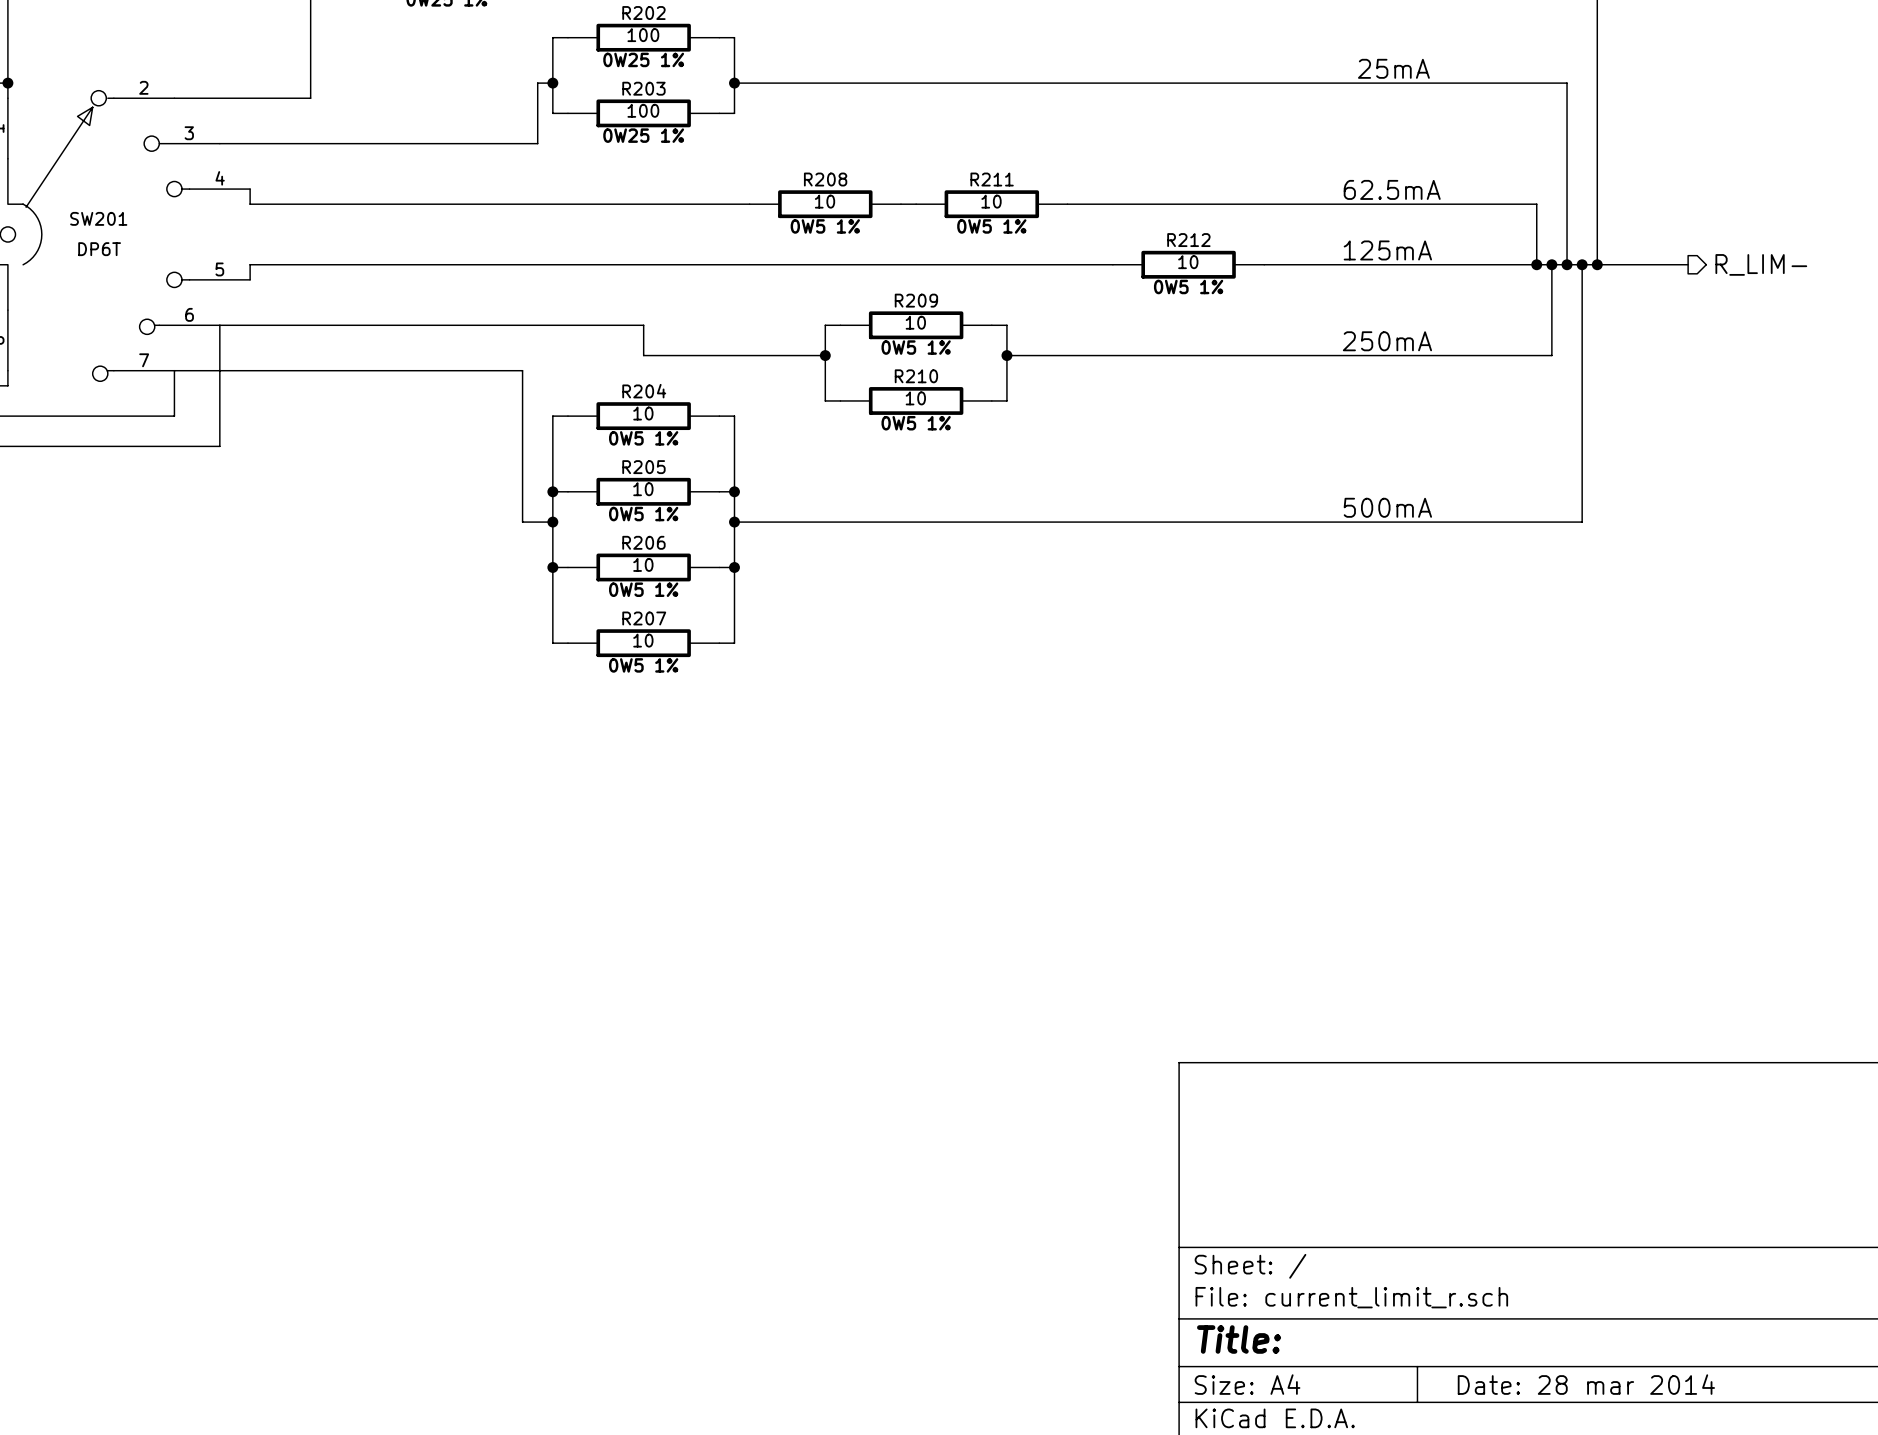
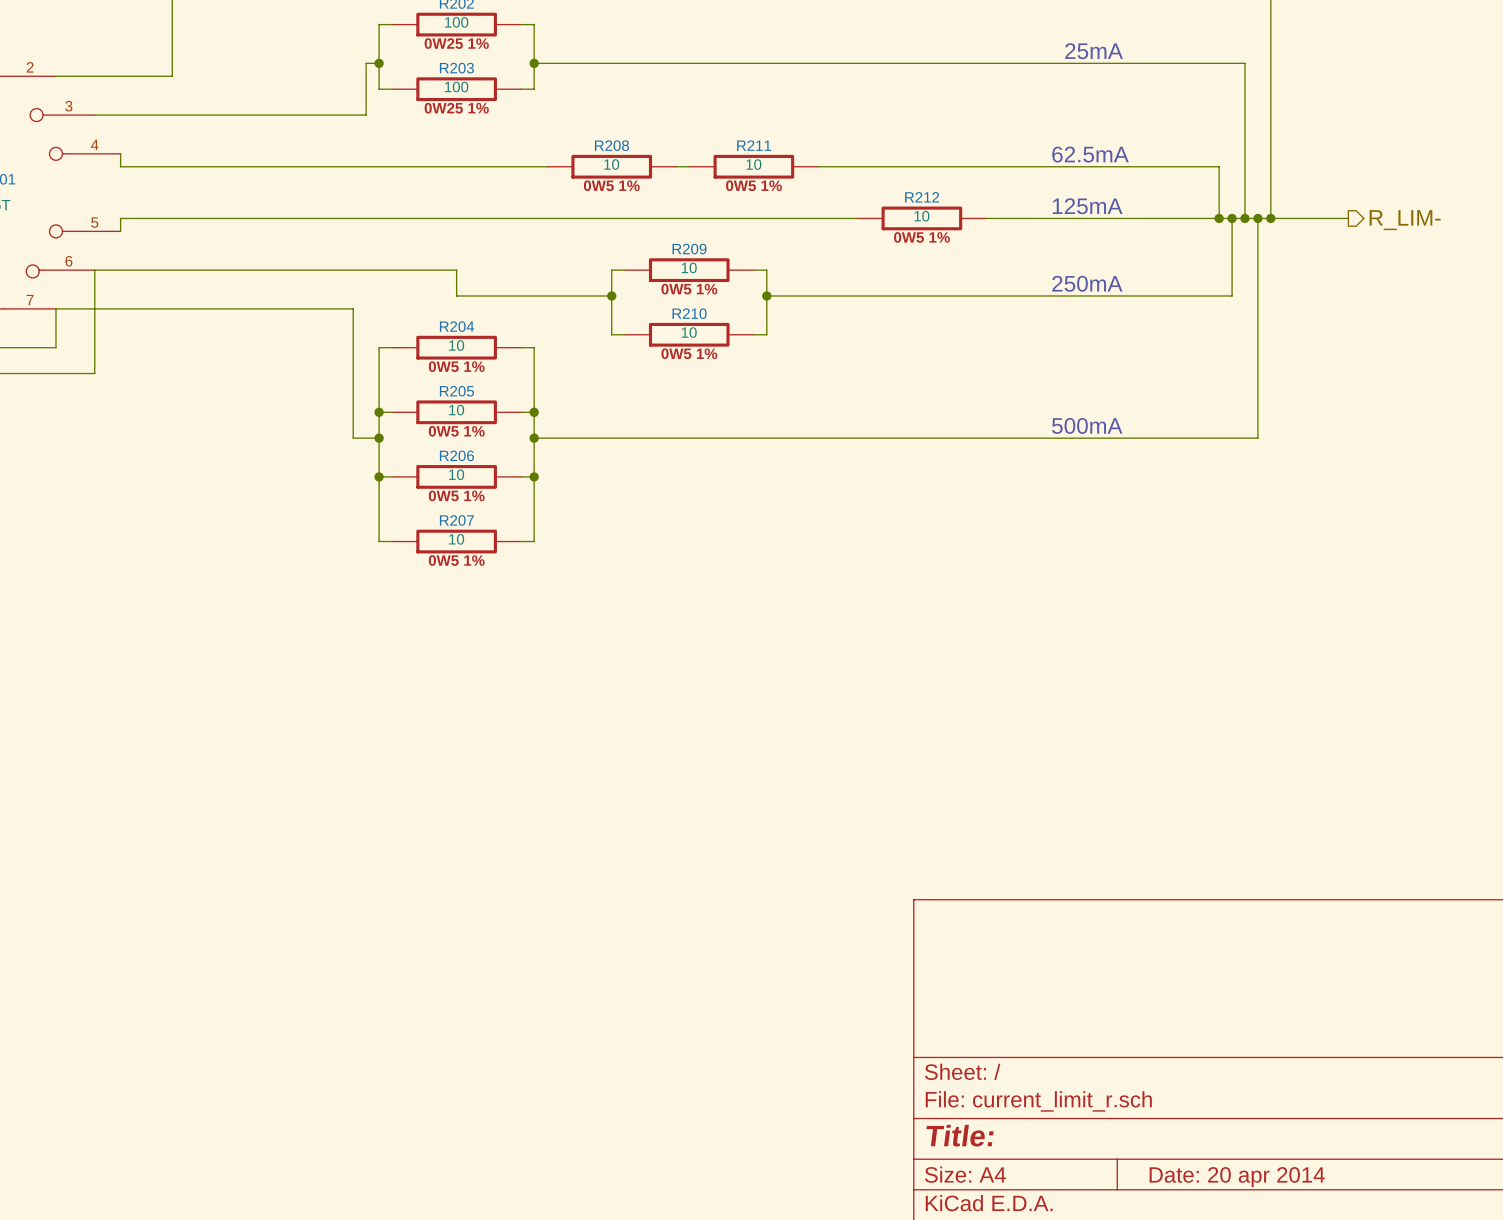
title block: Date: 28 mar 2014 (1586, 1384) -> Date: 20 apr 2014 (1237, 1177)

